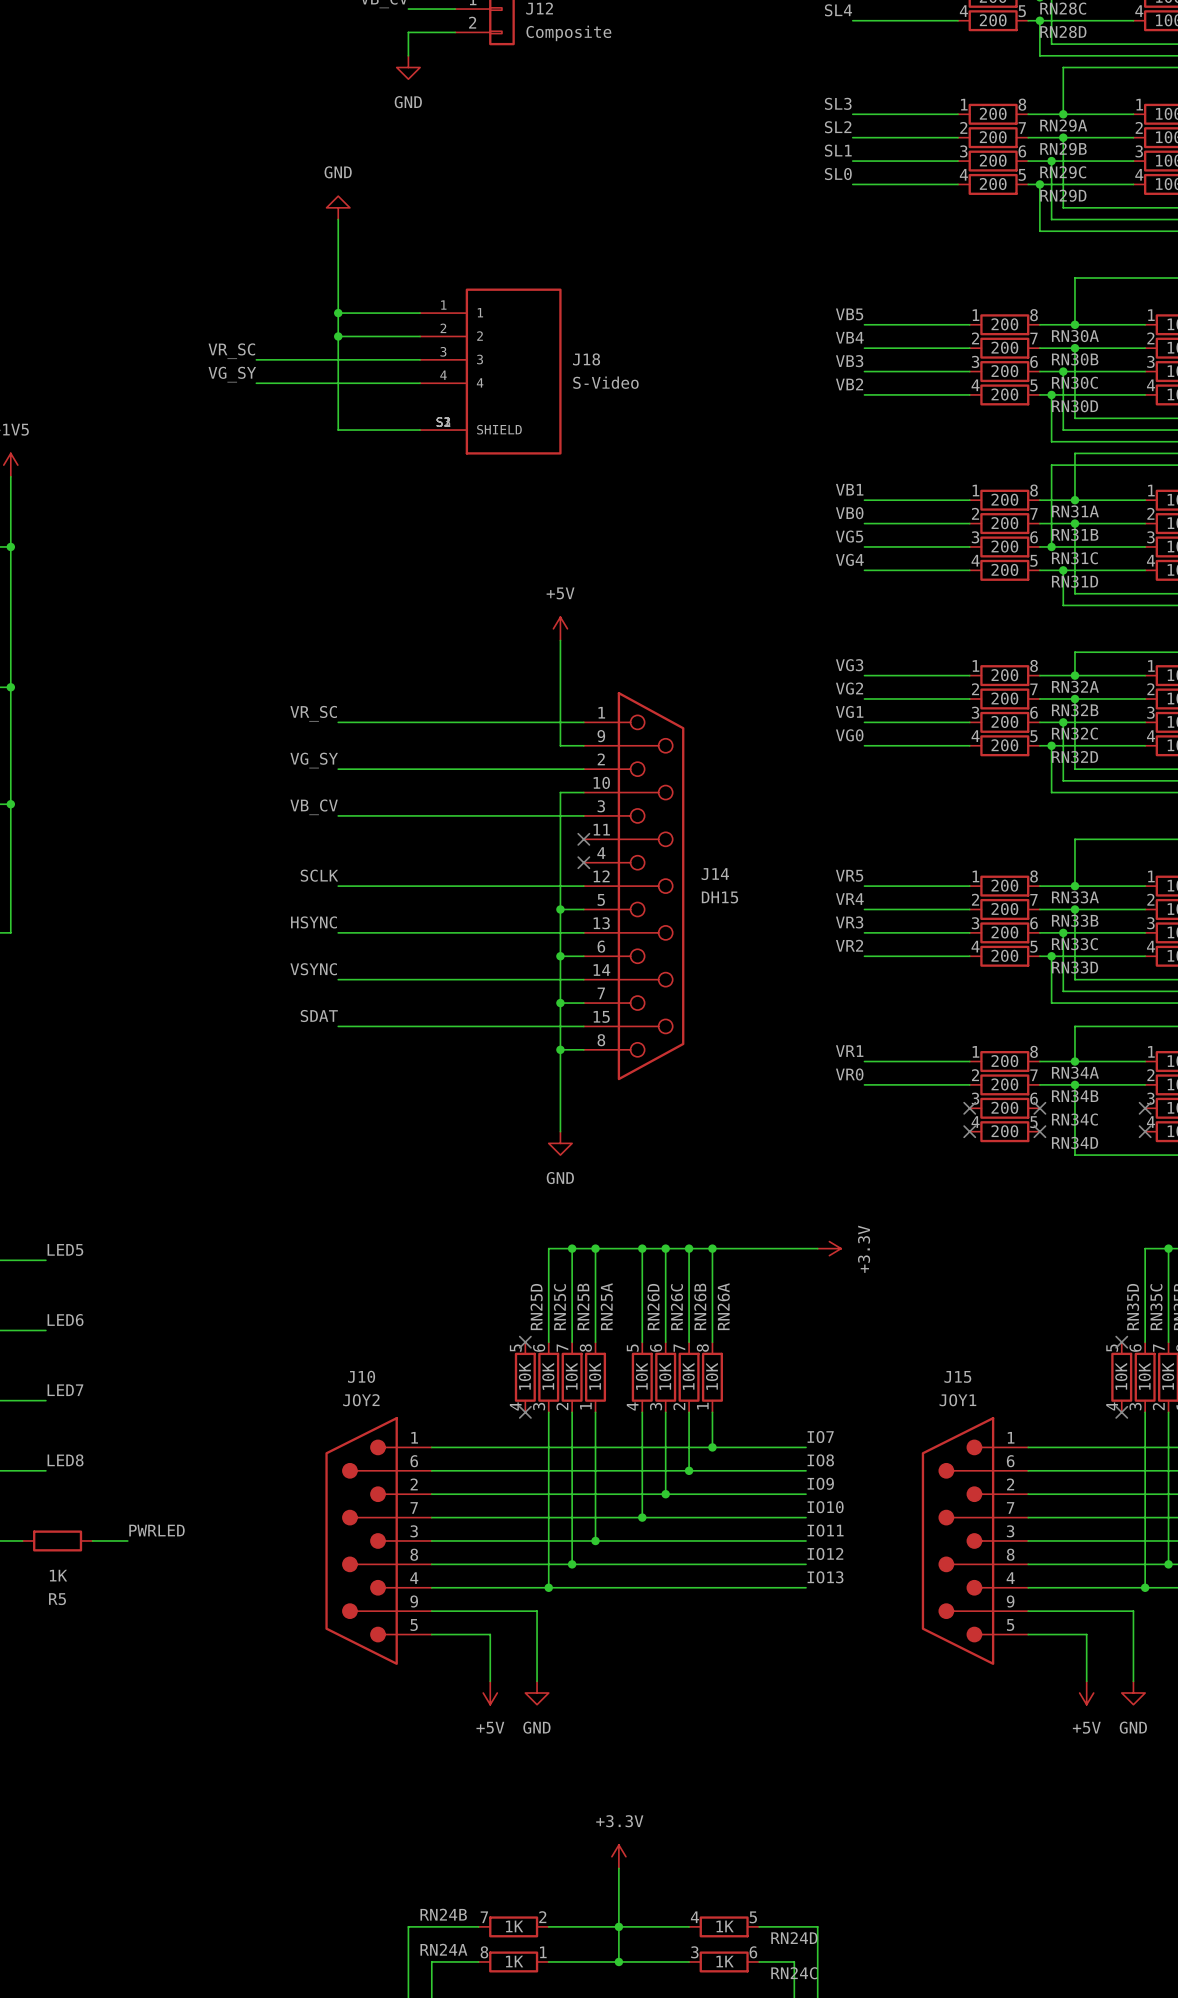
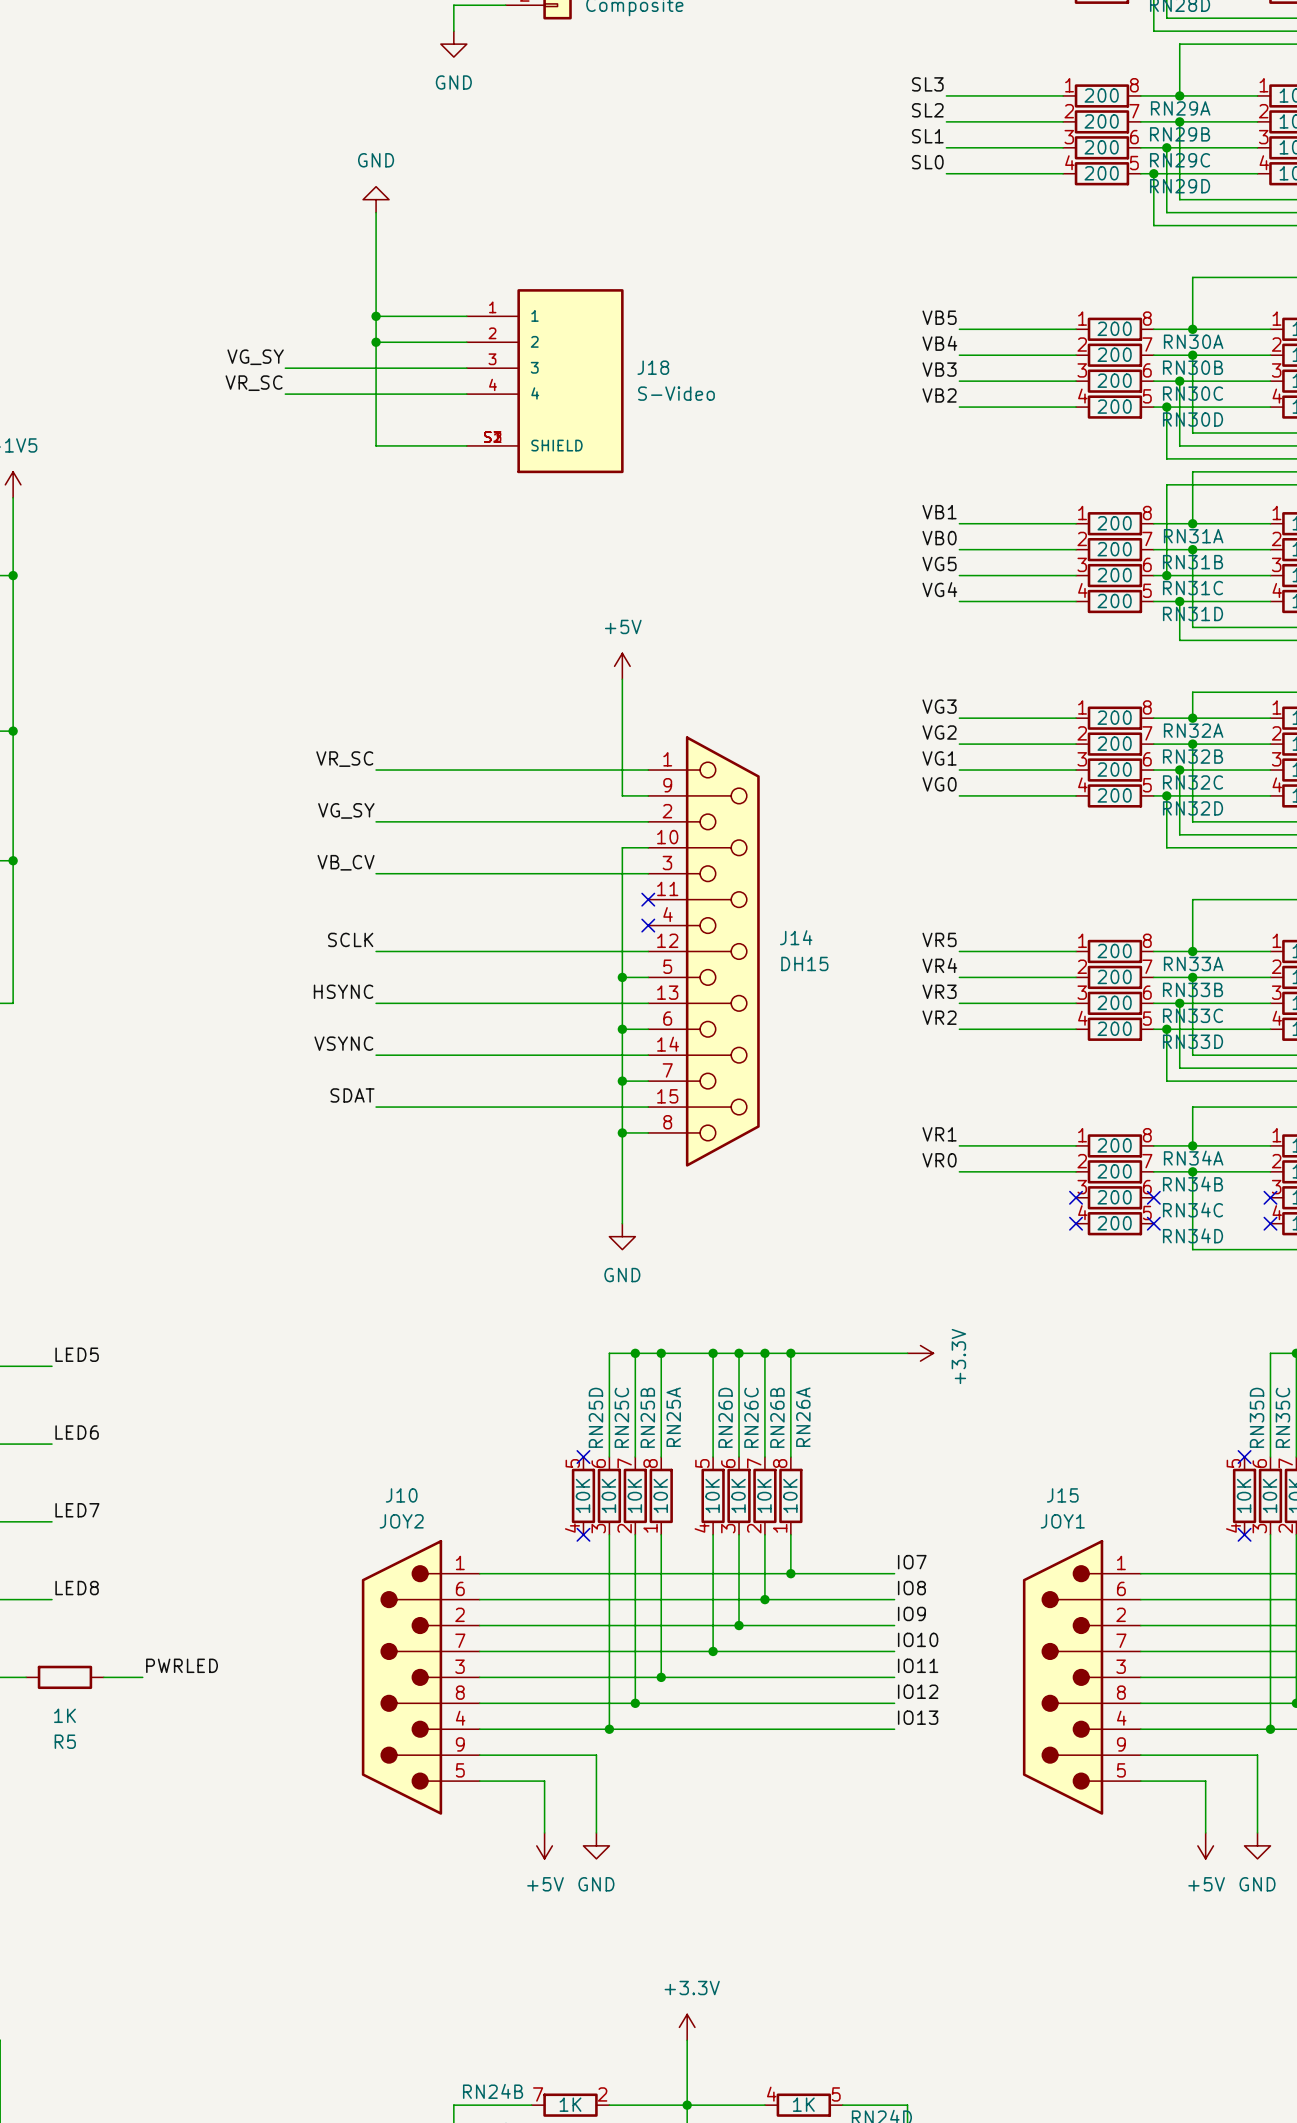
label: VR_SC (231, 351) -> VG_SY (255, 357)
label: VG_SY (232, 374) -> VR_SC (254, 383)

